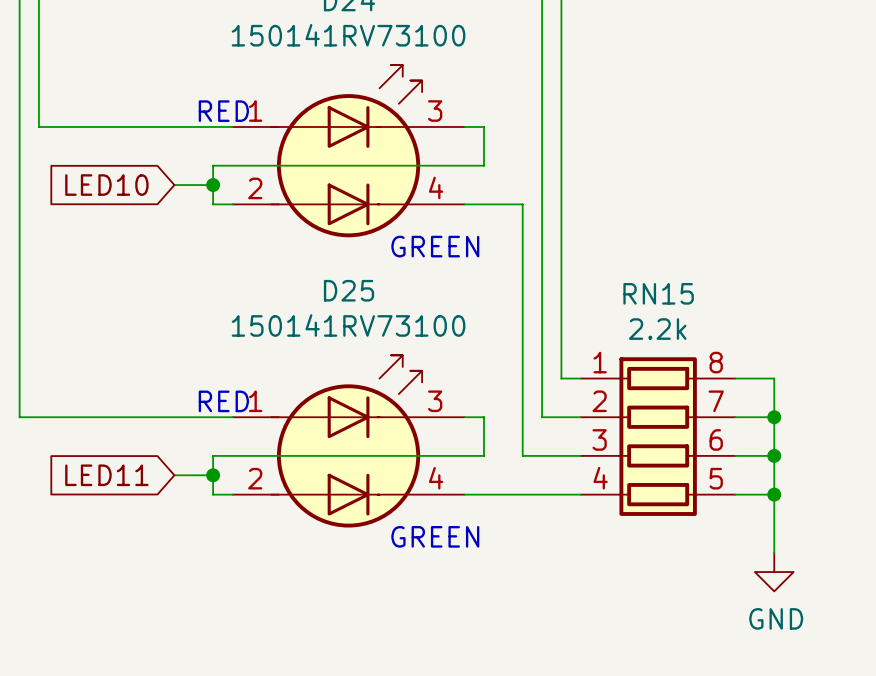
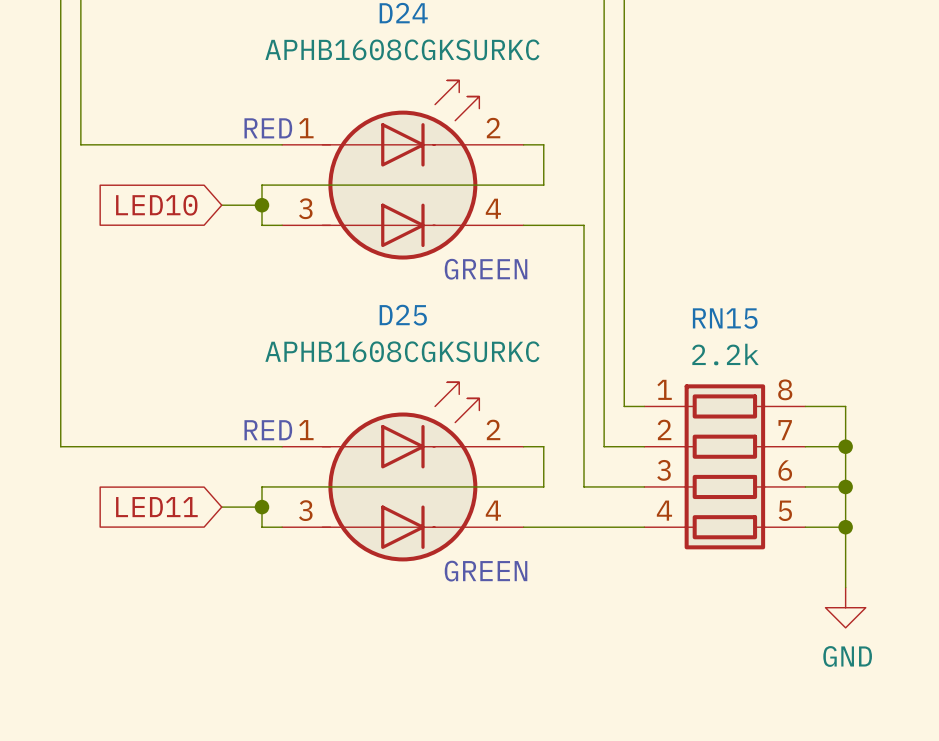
D24 value: 150141RV73100 (348, 35) -> APHB1608CGKSURKC (402, 49)
D24 pin number: 3 (435, 111) -> 2 (493, 128)
D24 pin number: 2 (255, 188) -> 3 (305, 208)
D25 value: 150141RV73100 (348, 325) -> APHB1608CGKSURKC (402, 351)
D25 pin number: 3 (435, 401) -> 2 (493, 429)
D25 pin number: 2 (255, 478) -> 3 (305, 510)

